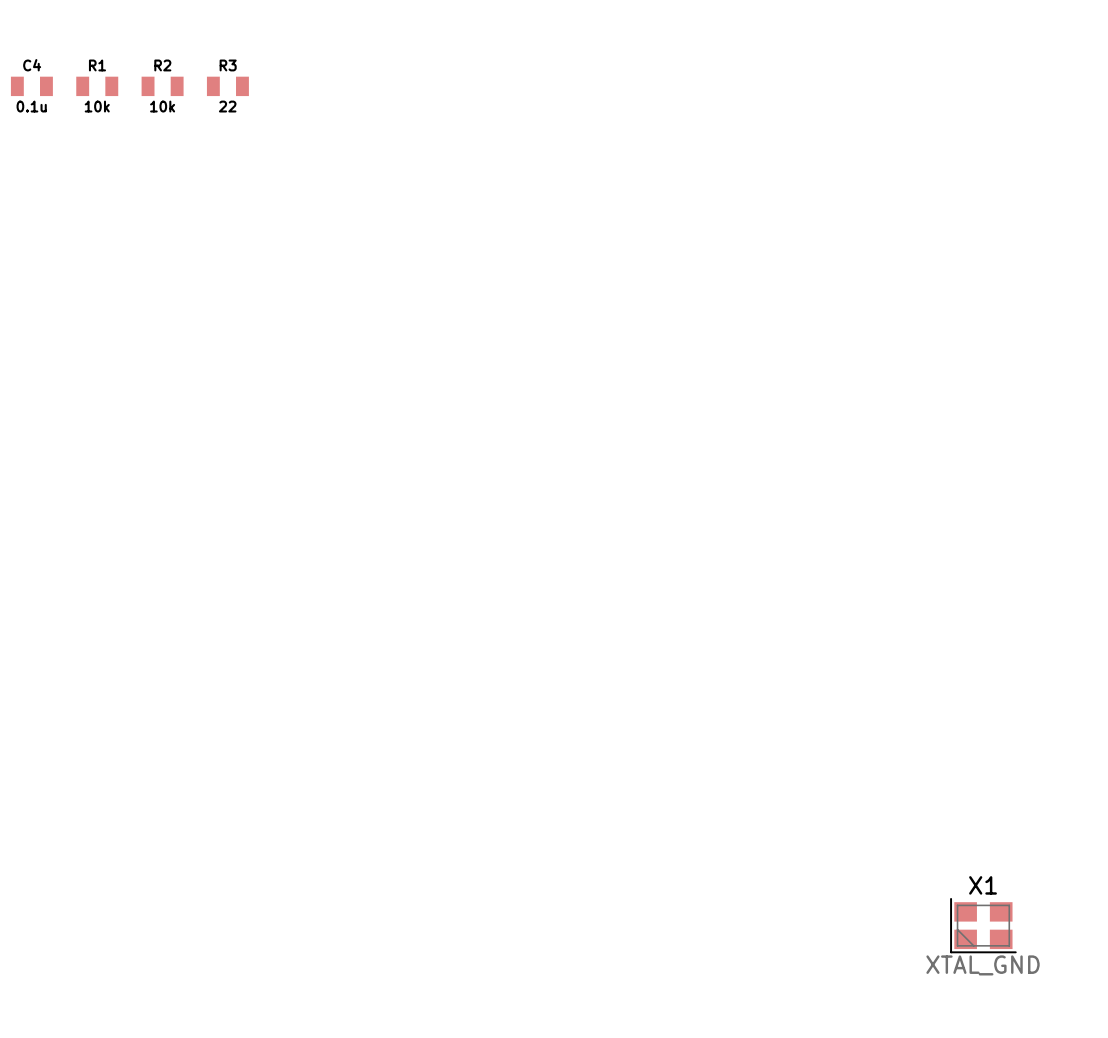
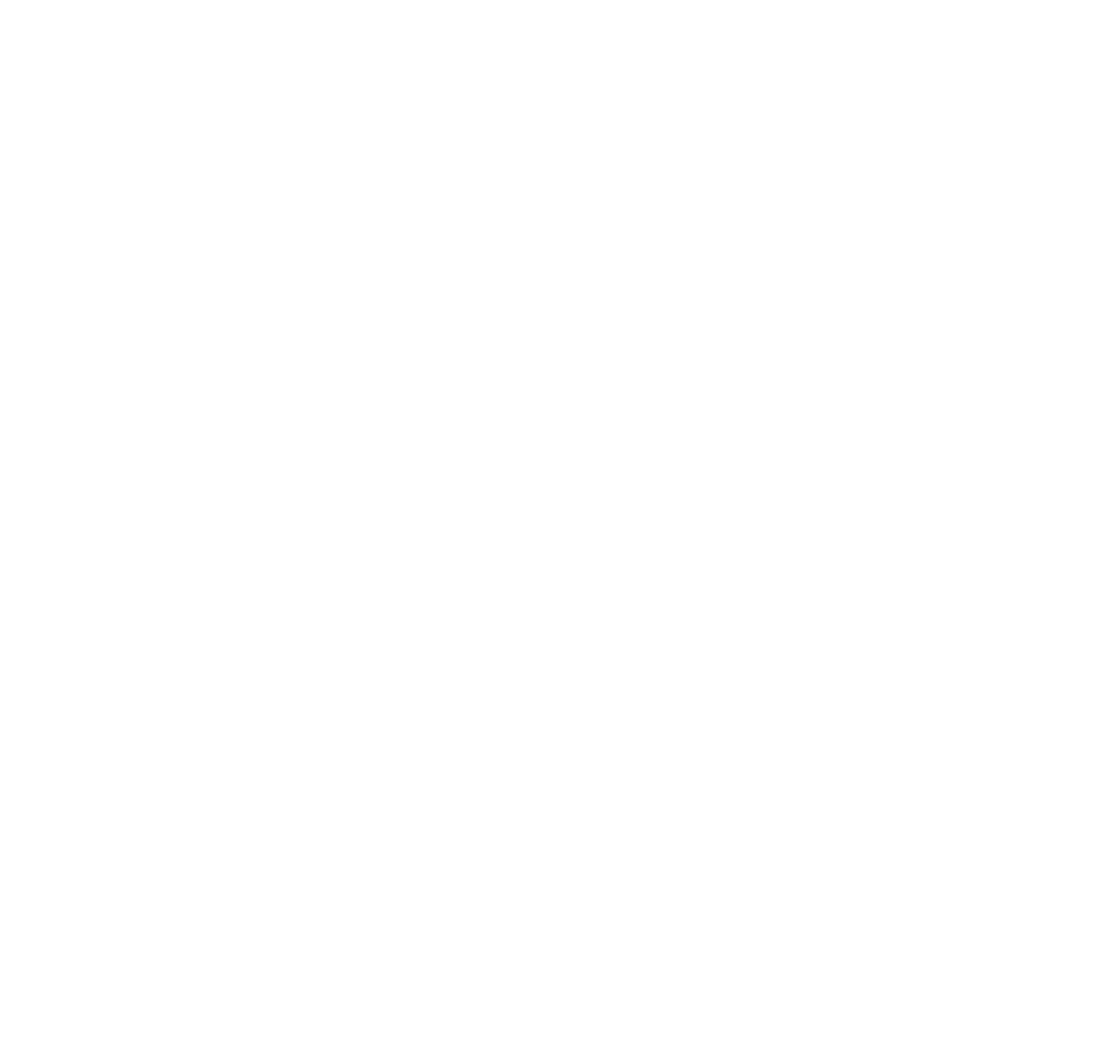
C4: 0.1u (31, 86) -> none
R1: 10k (97, 86) -> none
R2: 10k (162, 86) -> none
R3: 22 (227, 86) -> none
X1: XTAL_GND (983, 925) -> none

